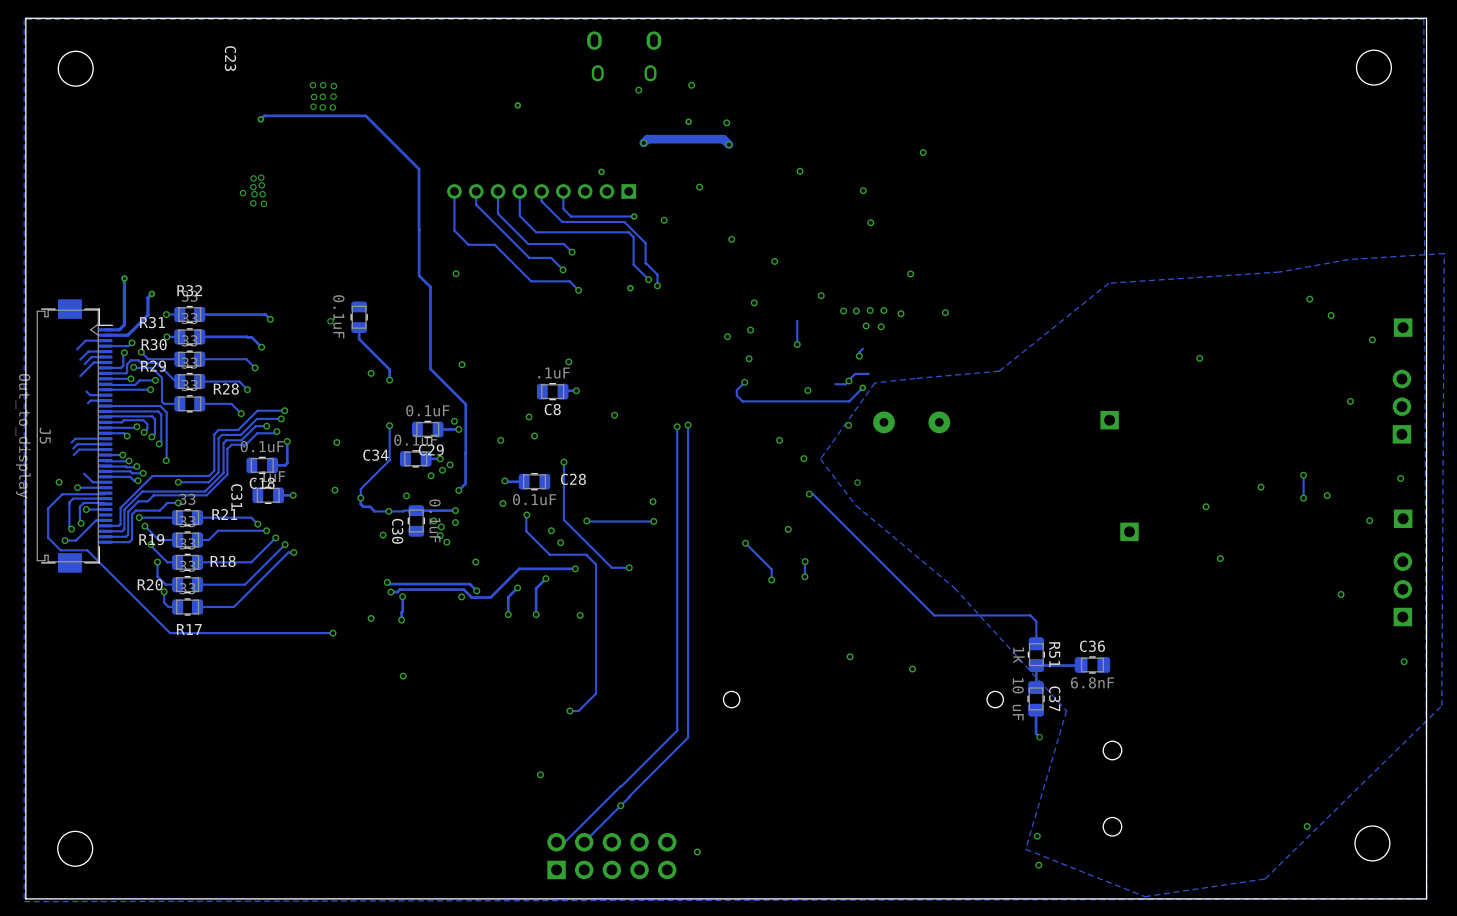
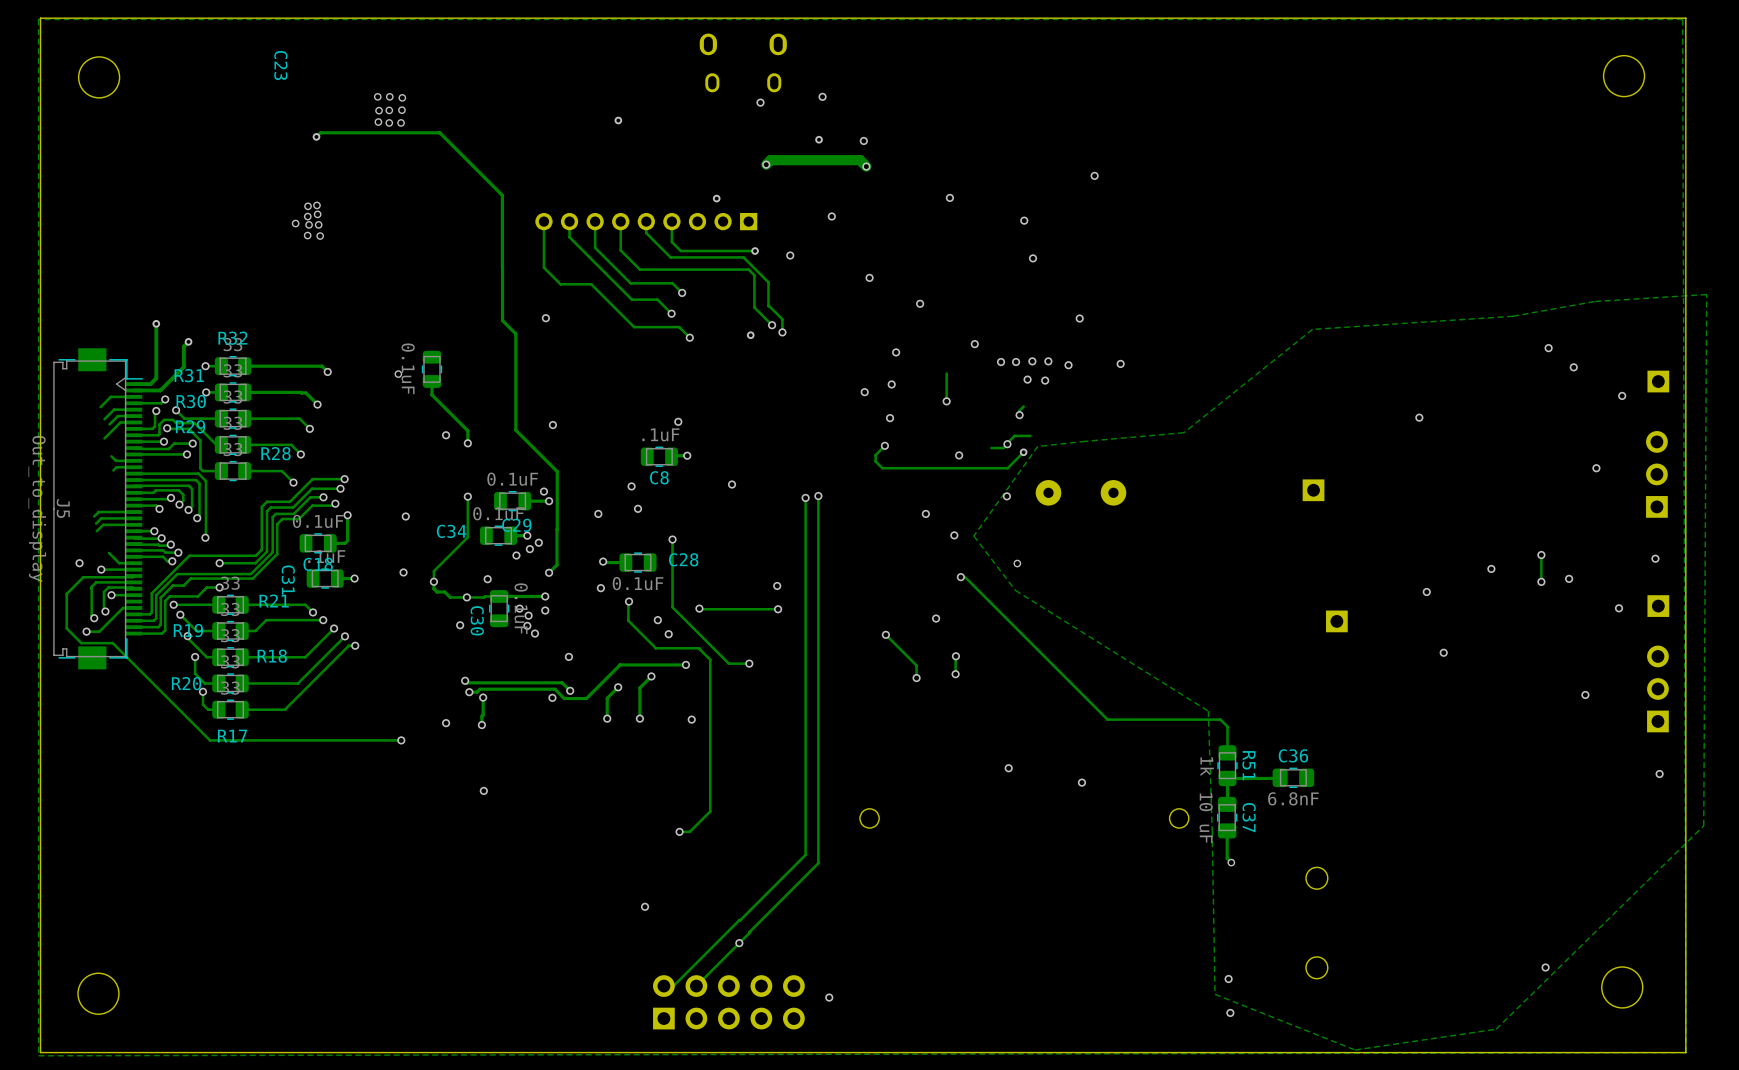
zone outline: (855, 505) (954, 587) (1066, 710) (1025, 849) -> (1015, 590) (1208, 711) (1215, 994)

